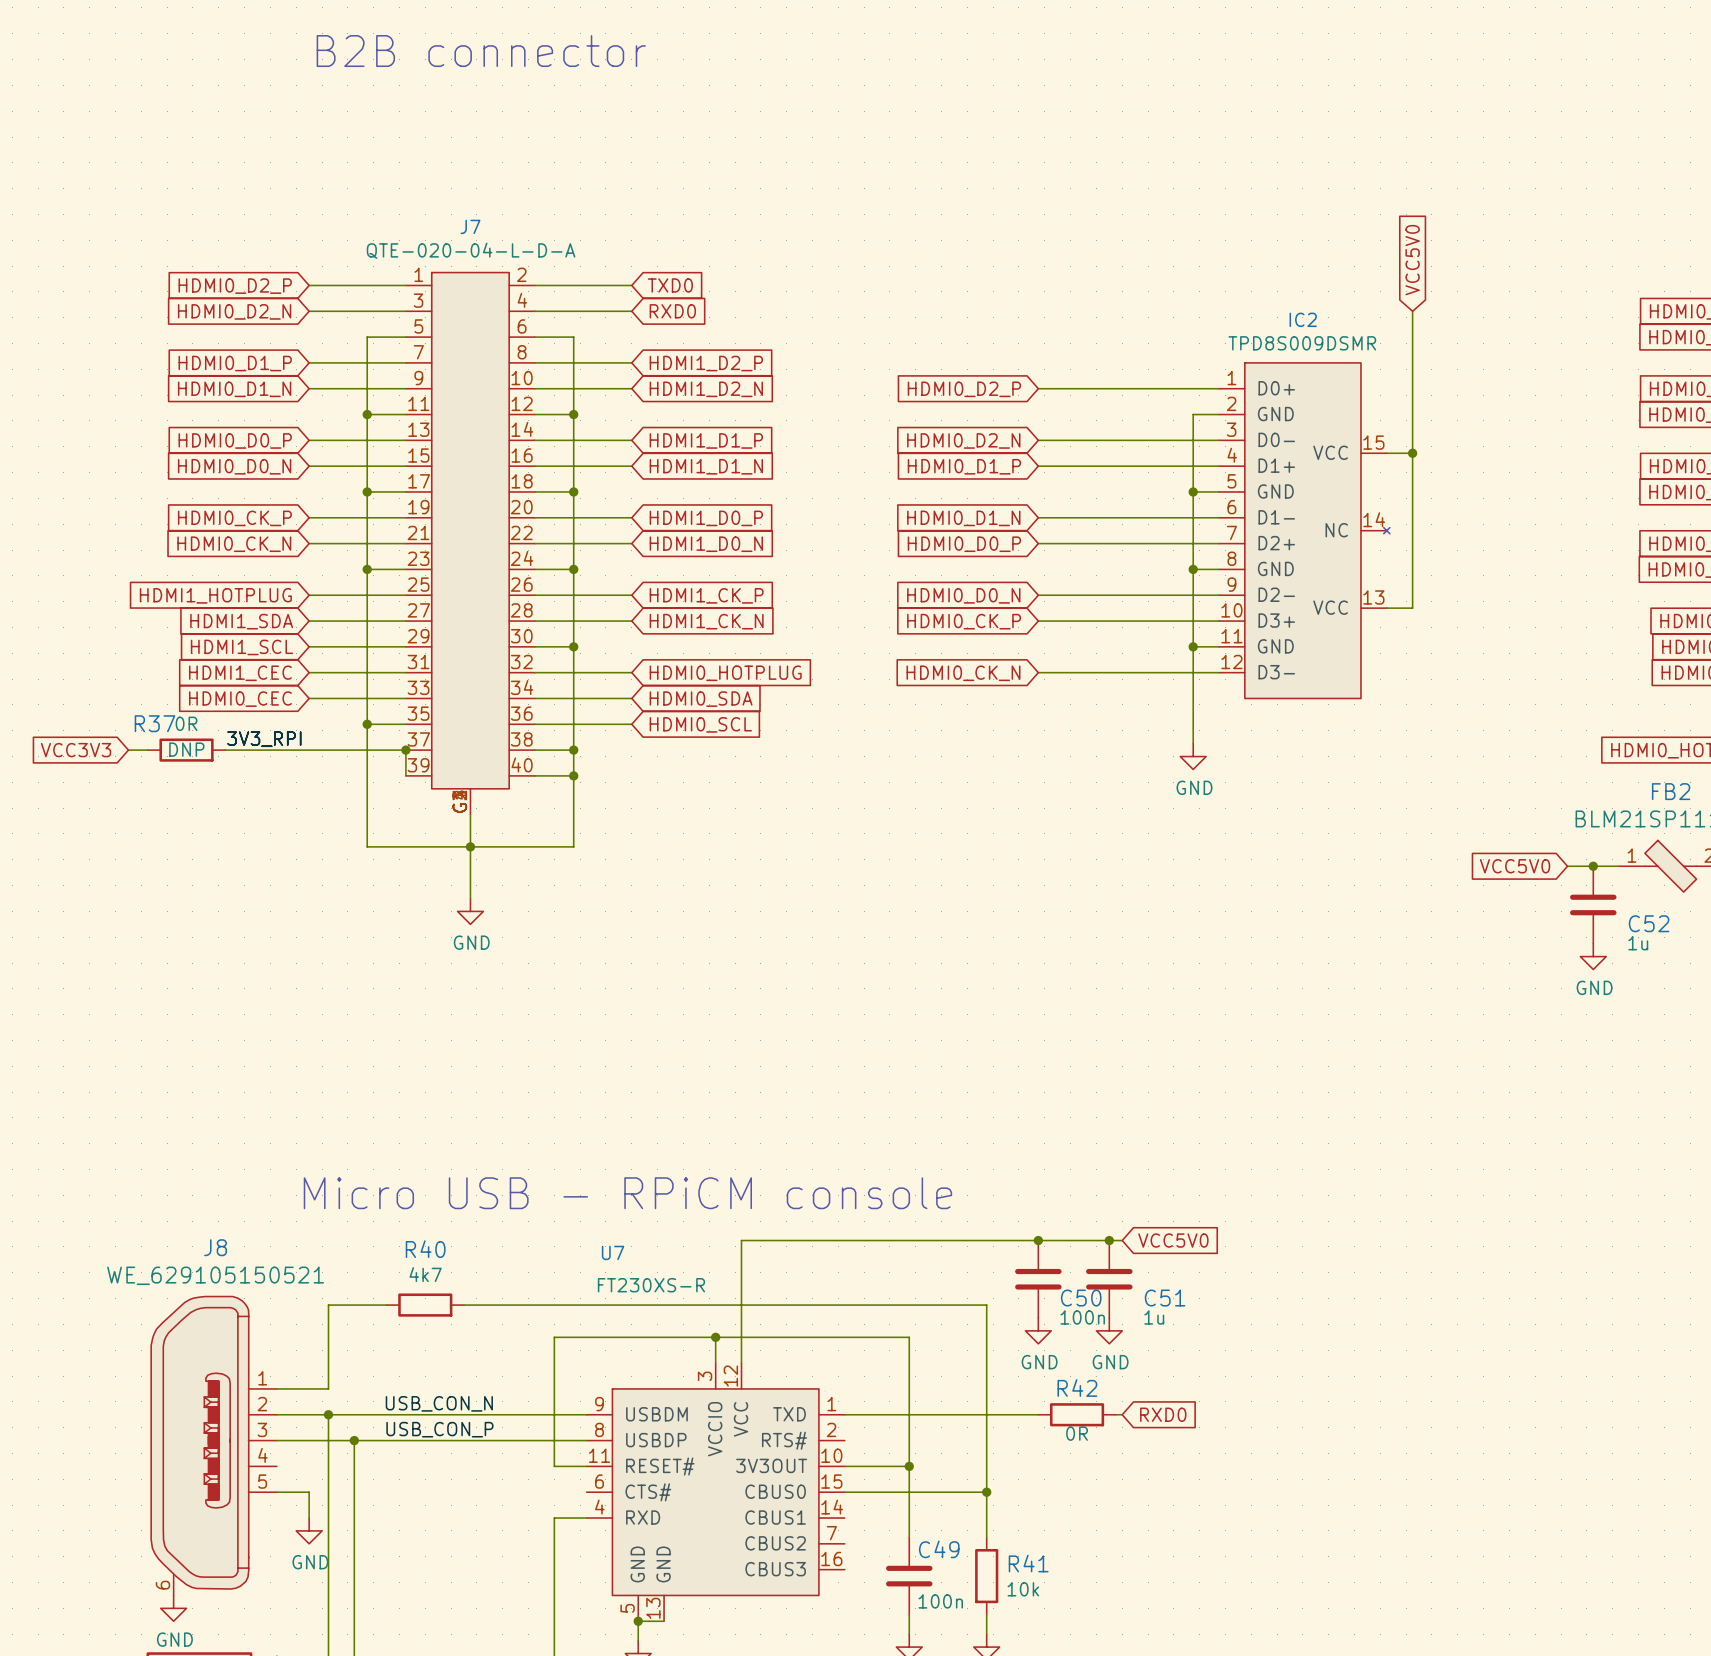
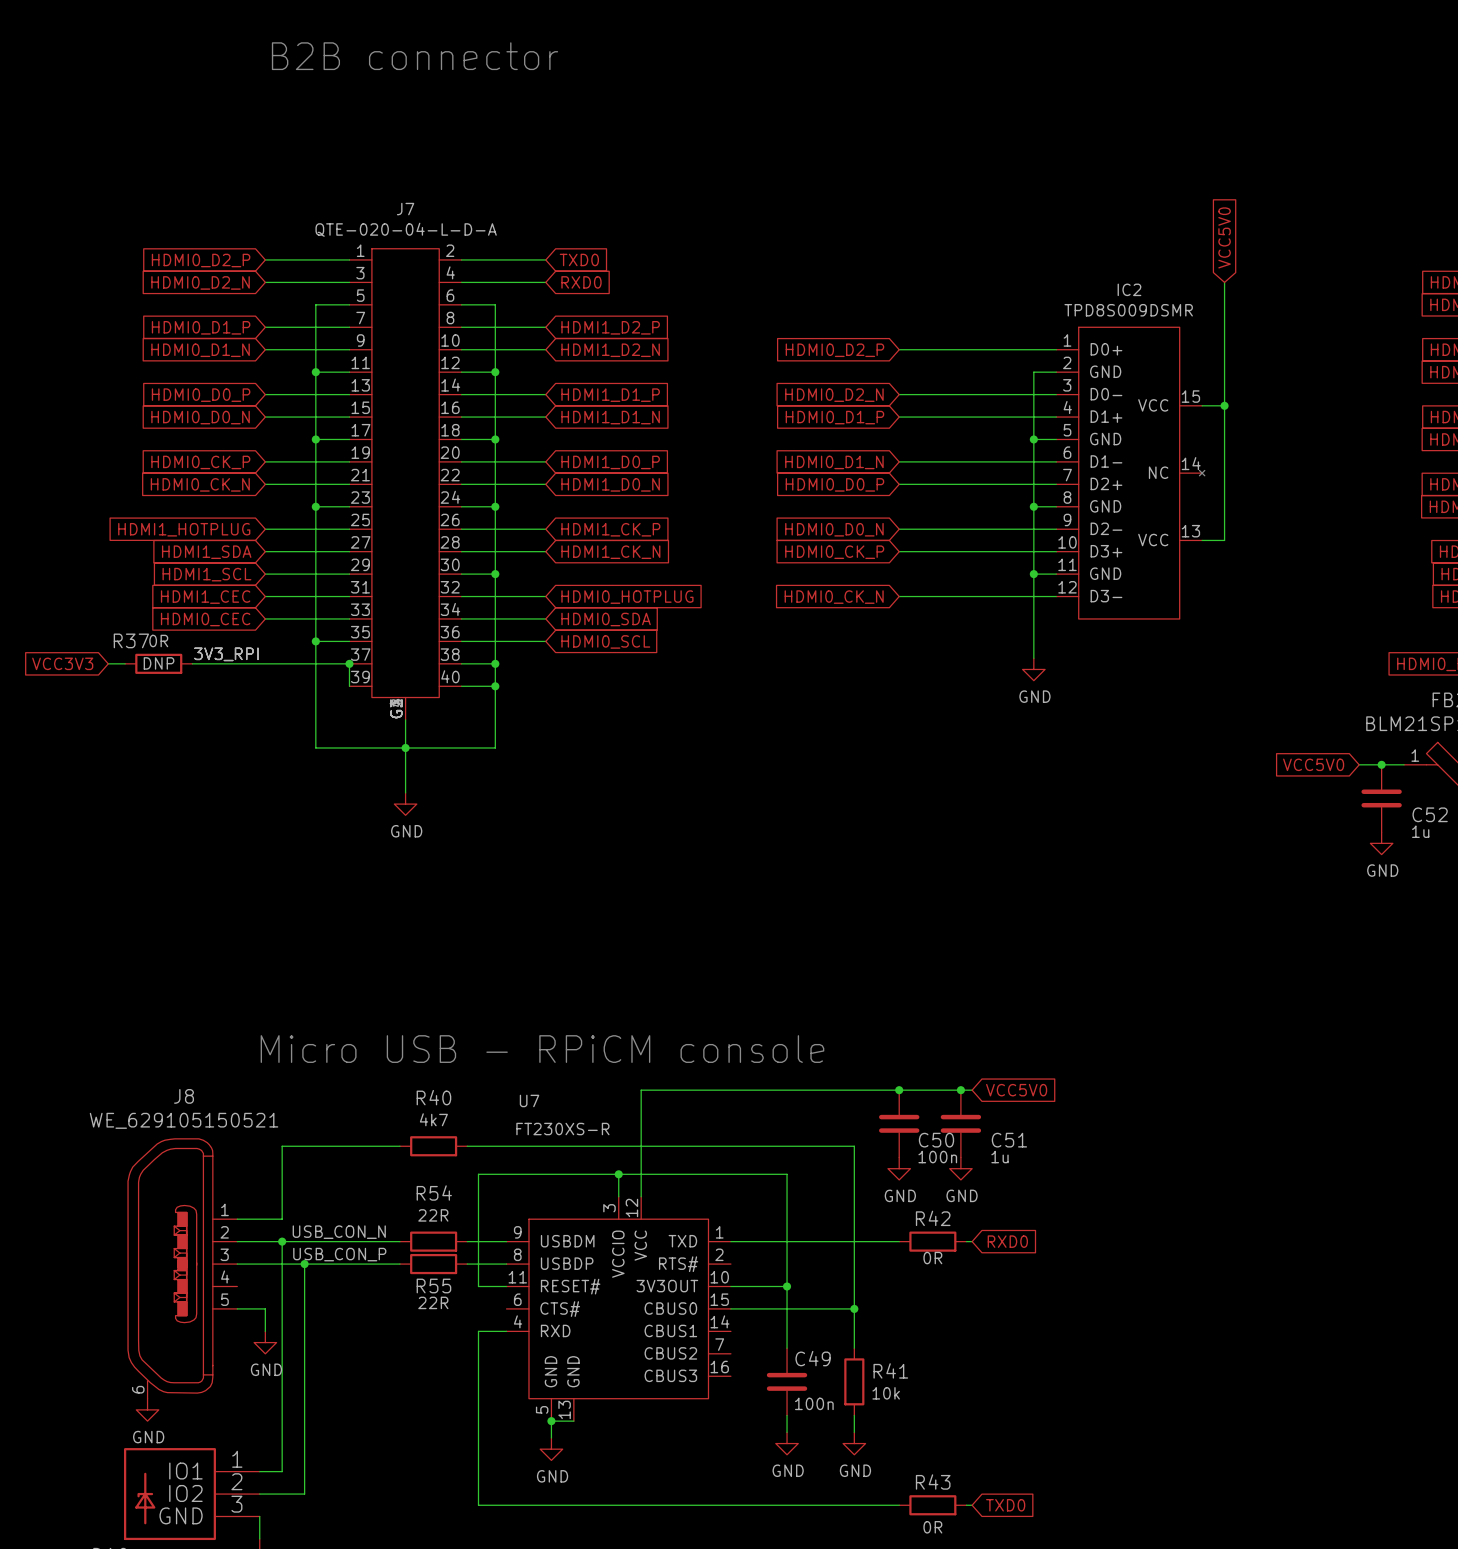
R40 position: (425, 1305) -> (433, 1146)
wire: (464, 1305) (541, 1305) -> (399, 1146) (332, 1146)
label position: USB_CON_N (439, 1403) -> USB_CON_N (339, 1232)
wire: (464, 1414) (541, 1414) -> none
R54: none -> (433, 1241)
label position: USB_CON_P (439, 1429) -> USB_CON_P (339, 1254)
wire: (464, 1440) (541, 1440) -> none
R55: none -> (433, 1264)

